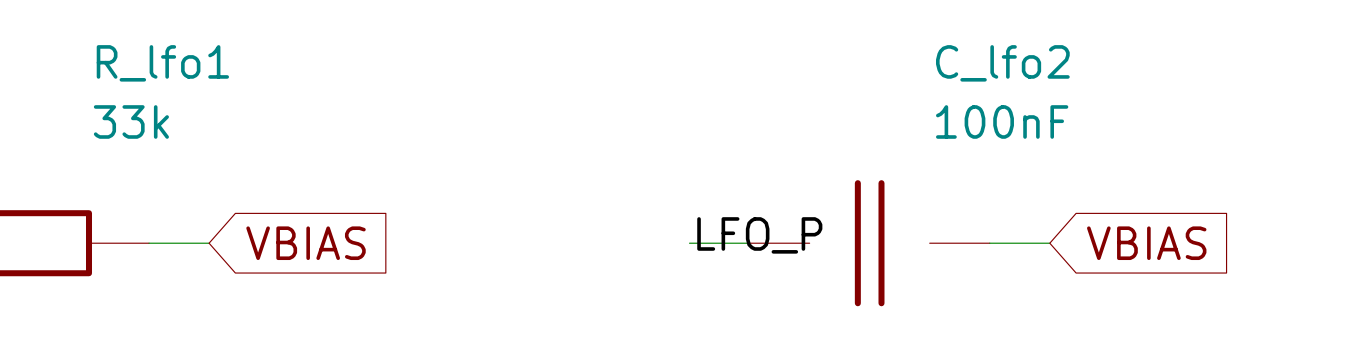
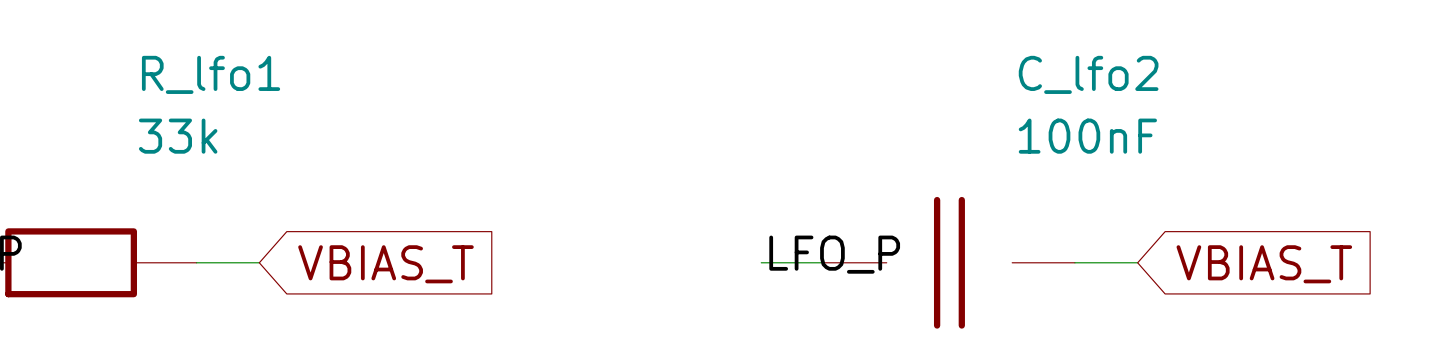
global label: VBIAS (306, 243) -> VBIAS_T (385, 264)
global label: VBIAS (1146, 243) -> VBIAS_T (1264, 264)

